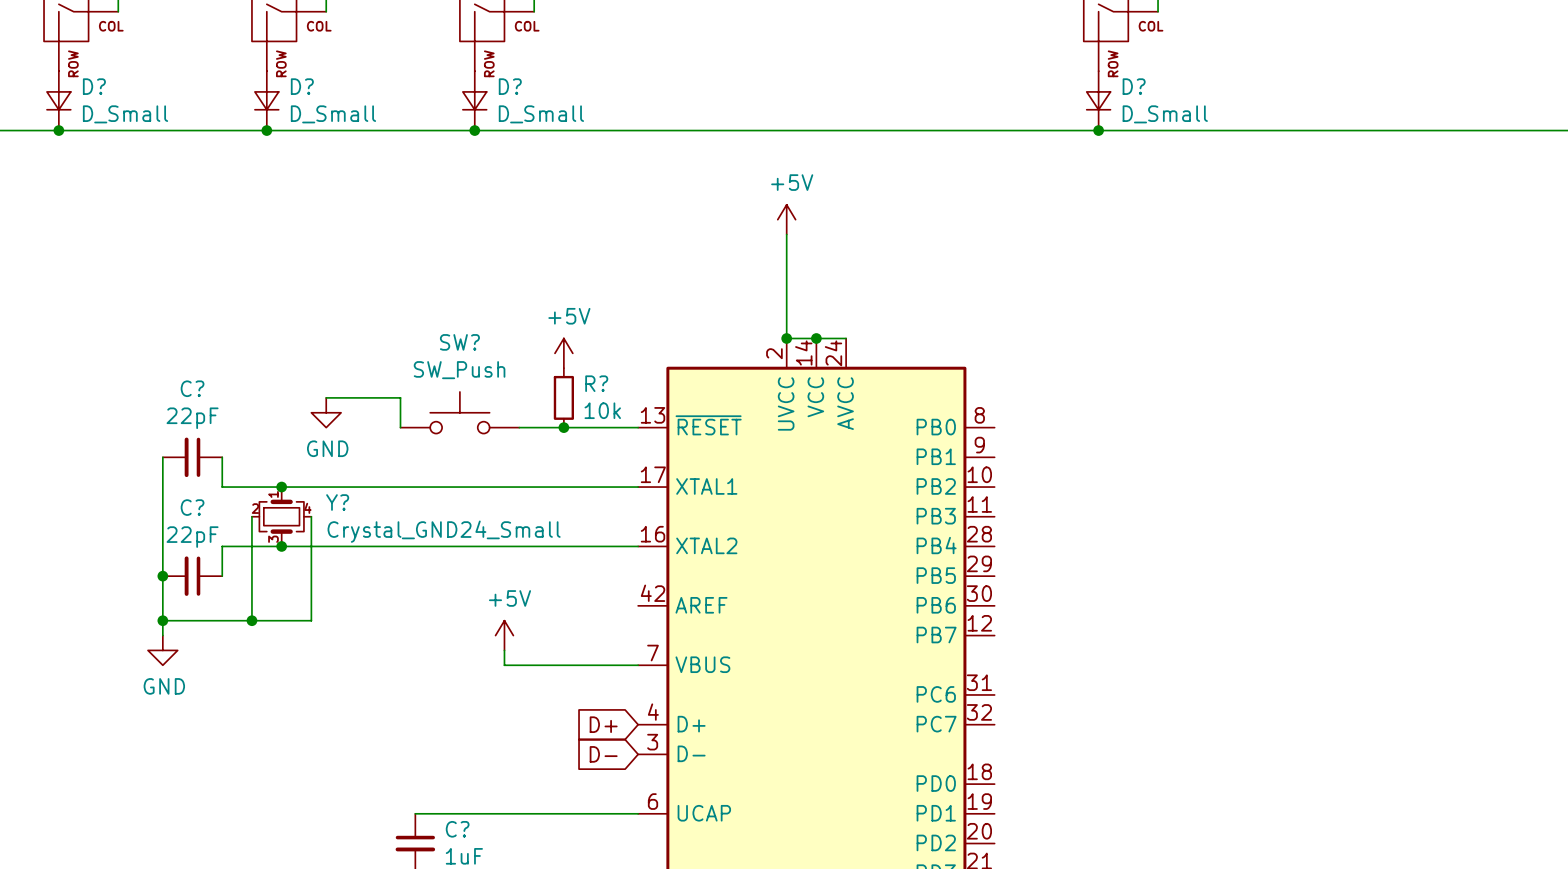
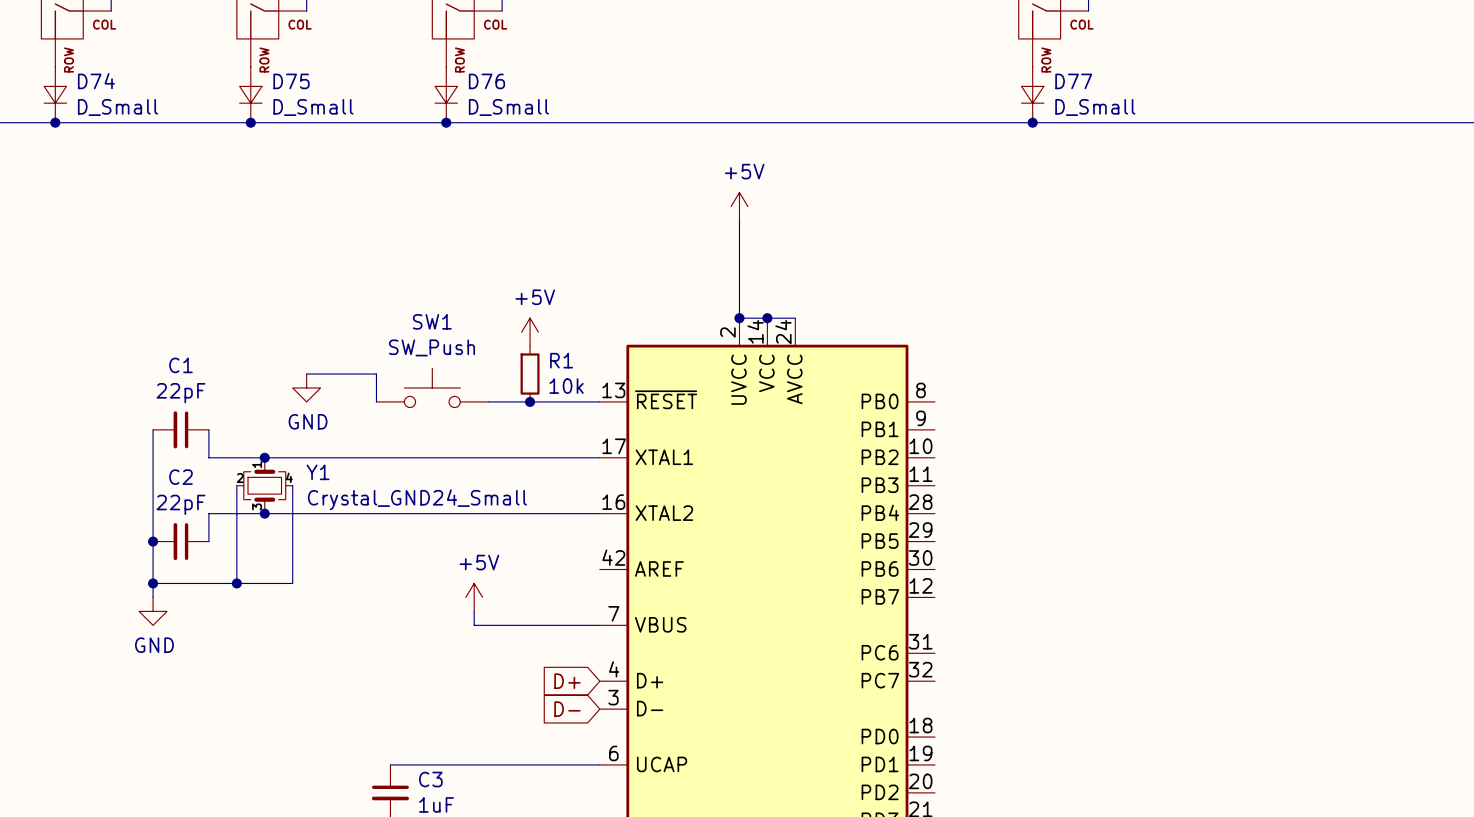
D? name: D? (94, 86) -> D74 (96, 81)
D? name: D? (302, 86) -> D75 (291, 81)
D? name: D? (510, 86) -> D76 (486, 81)
D? name: D? (1134, 86) -> D77 (1073, 81)
SW? name: SW? (459, 342) -> SW1 (432, 321)
R? name: R? (596, 383) -> R1 (561, 360)
C? name: C? (192, 388) -> C1 (180, 365)
Y? name: Y? (337, 502) -> Y1 (318, 472)
C? name: C? (192, 507) -> C2 (180, 477)
C? name: C? (457, 829) -> C3 (430, 779)

